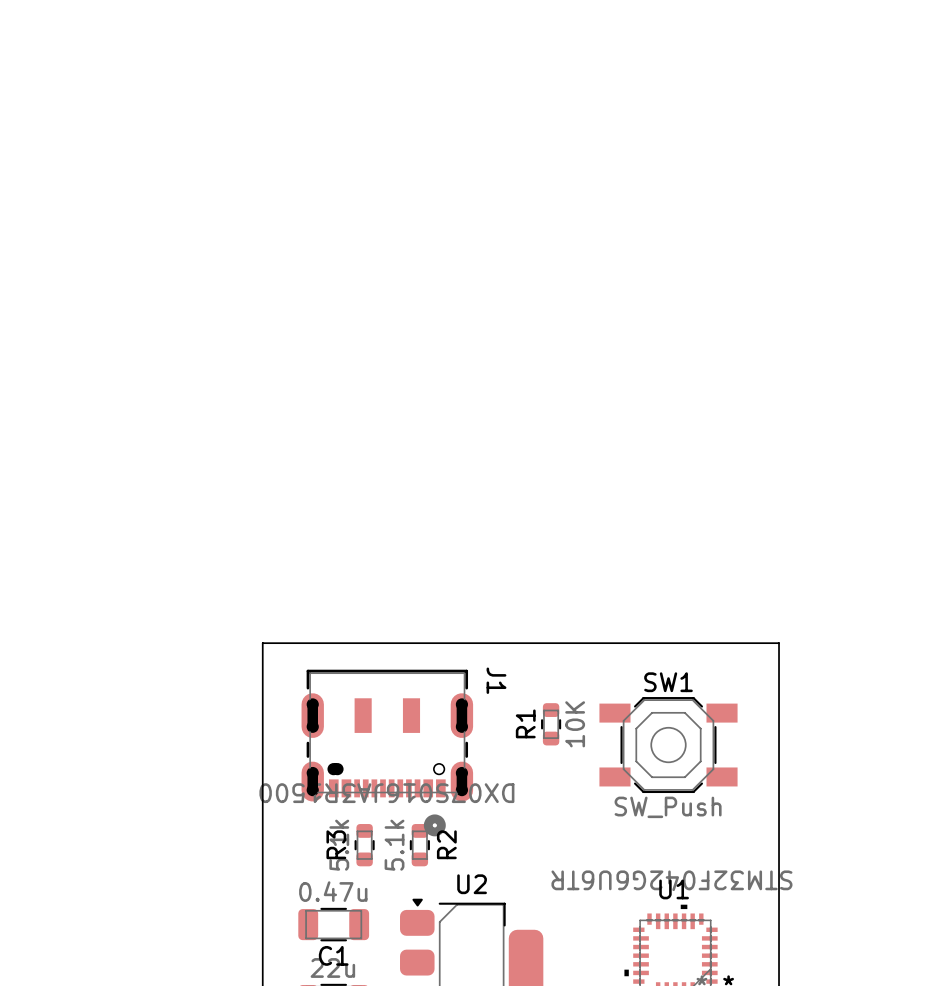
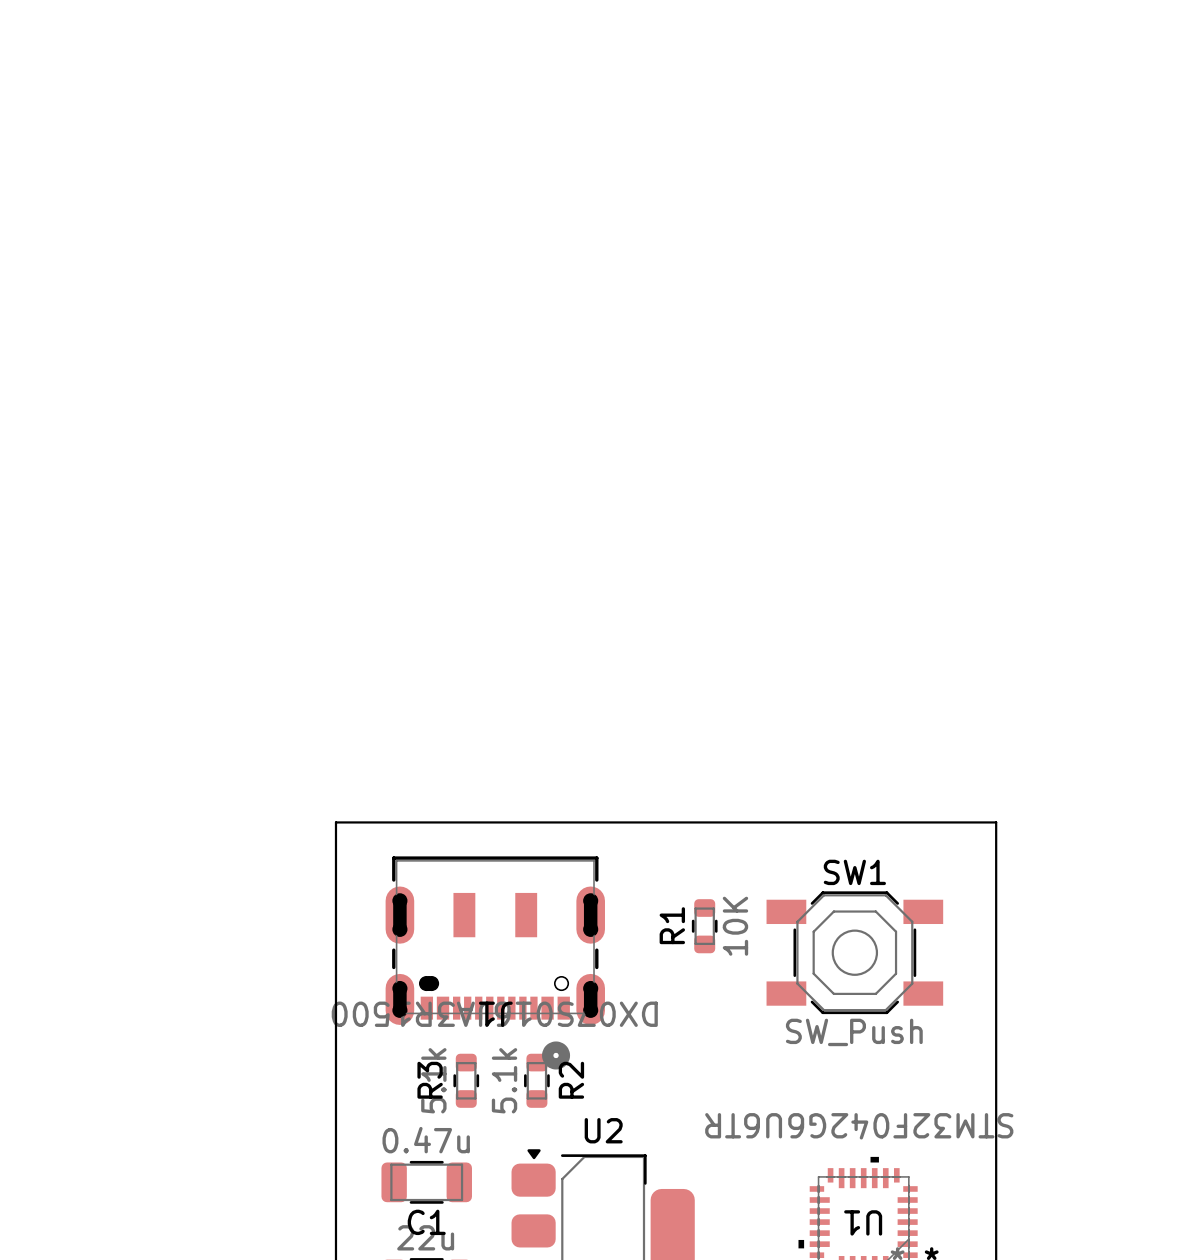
J1 name rotation: 0° (496, 680) -> 90° clockwise (495, 1014)
J1 name position: J1 (496, 680) -> J1 (495, 1014)
U1 name rotation: 0° (674, 889) -> 180° (863, 1222)
U1 name position: U1 (674, 889) -> U1 (863, 1222)

